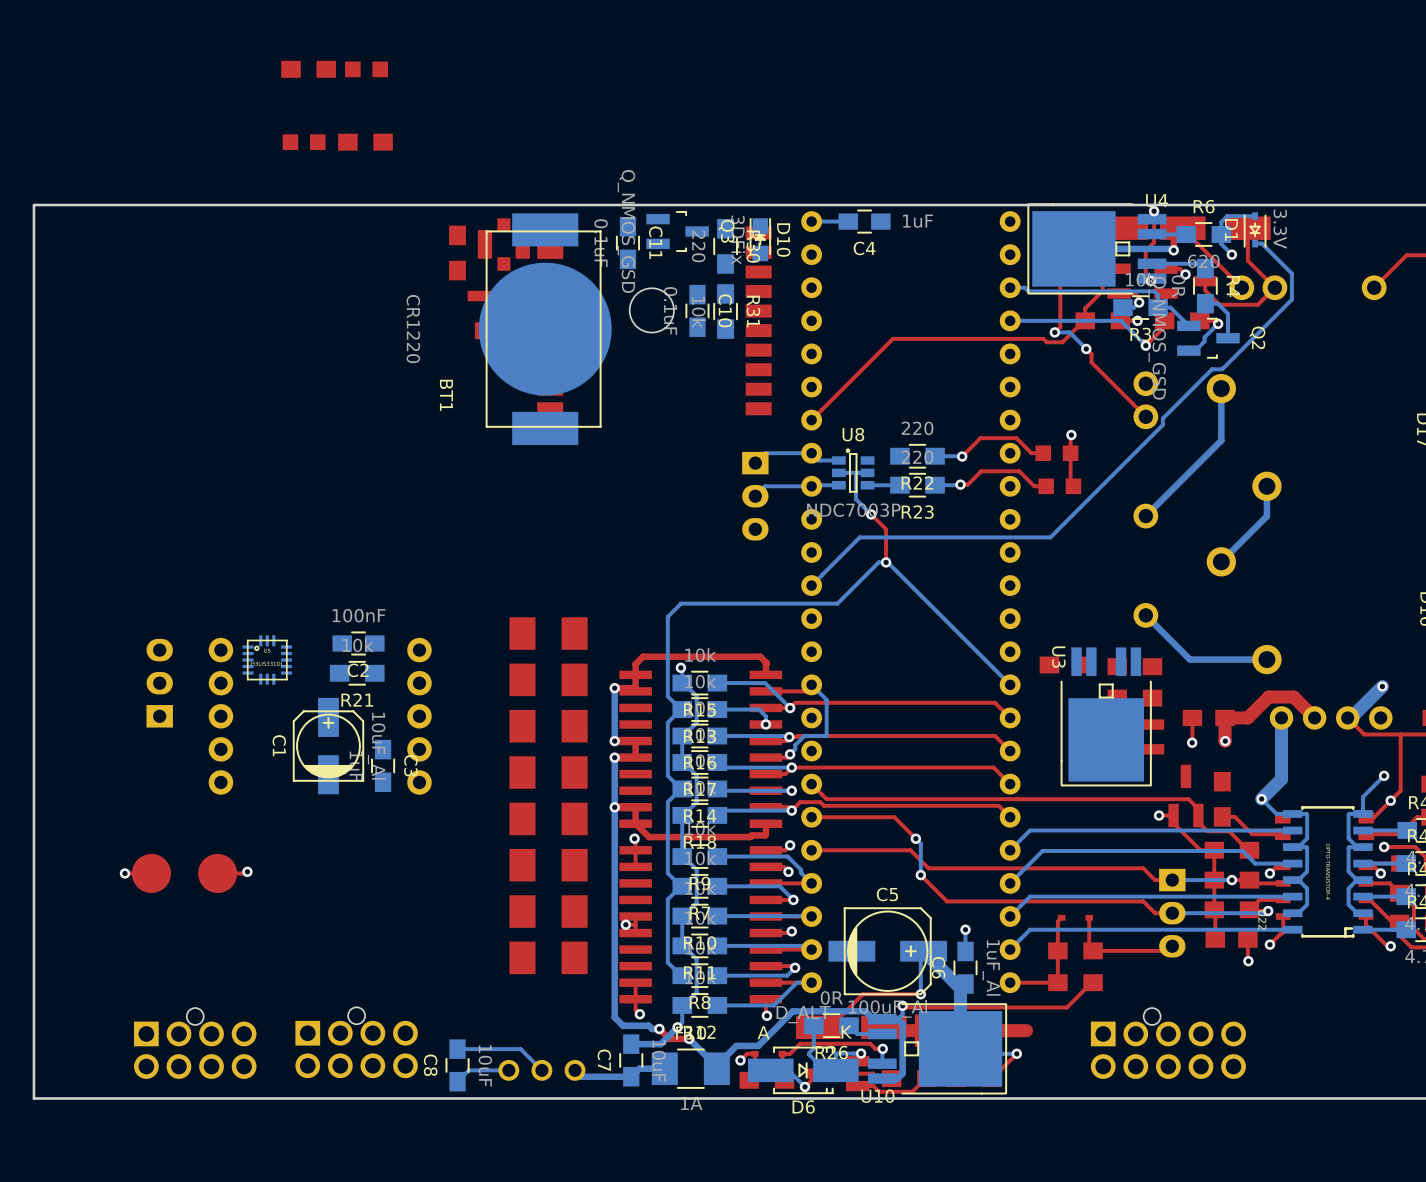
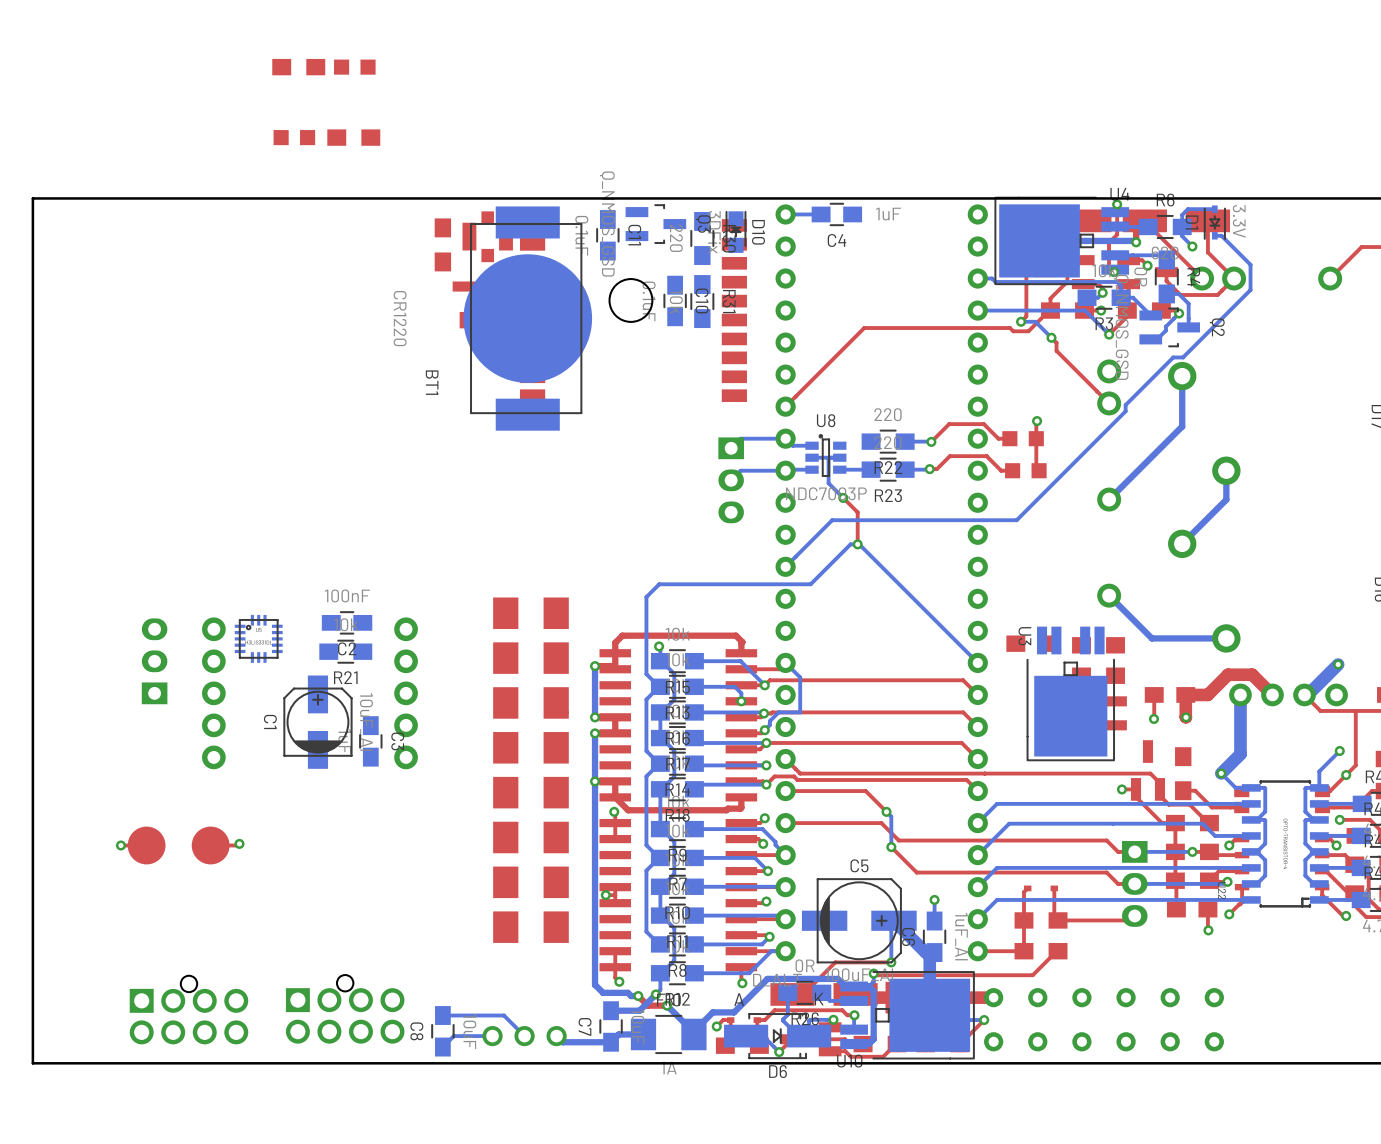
part: (1168, 1043) -> none
part: none -> (1103, 1019)

